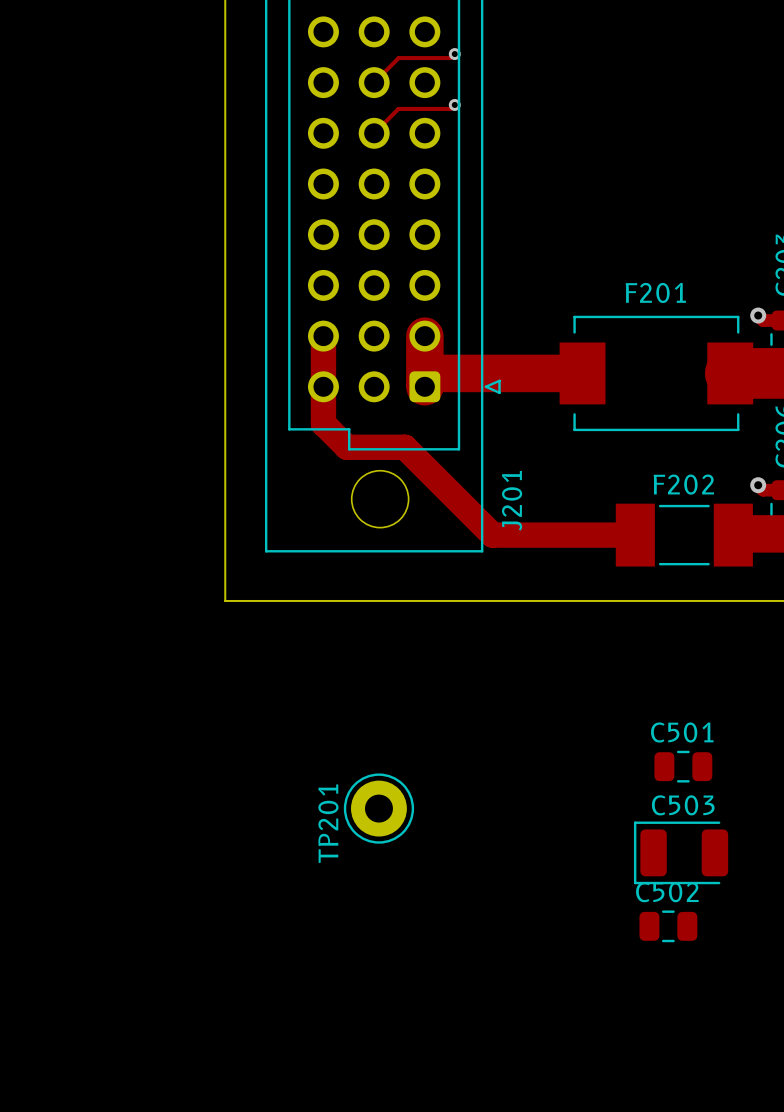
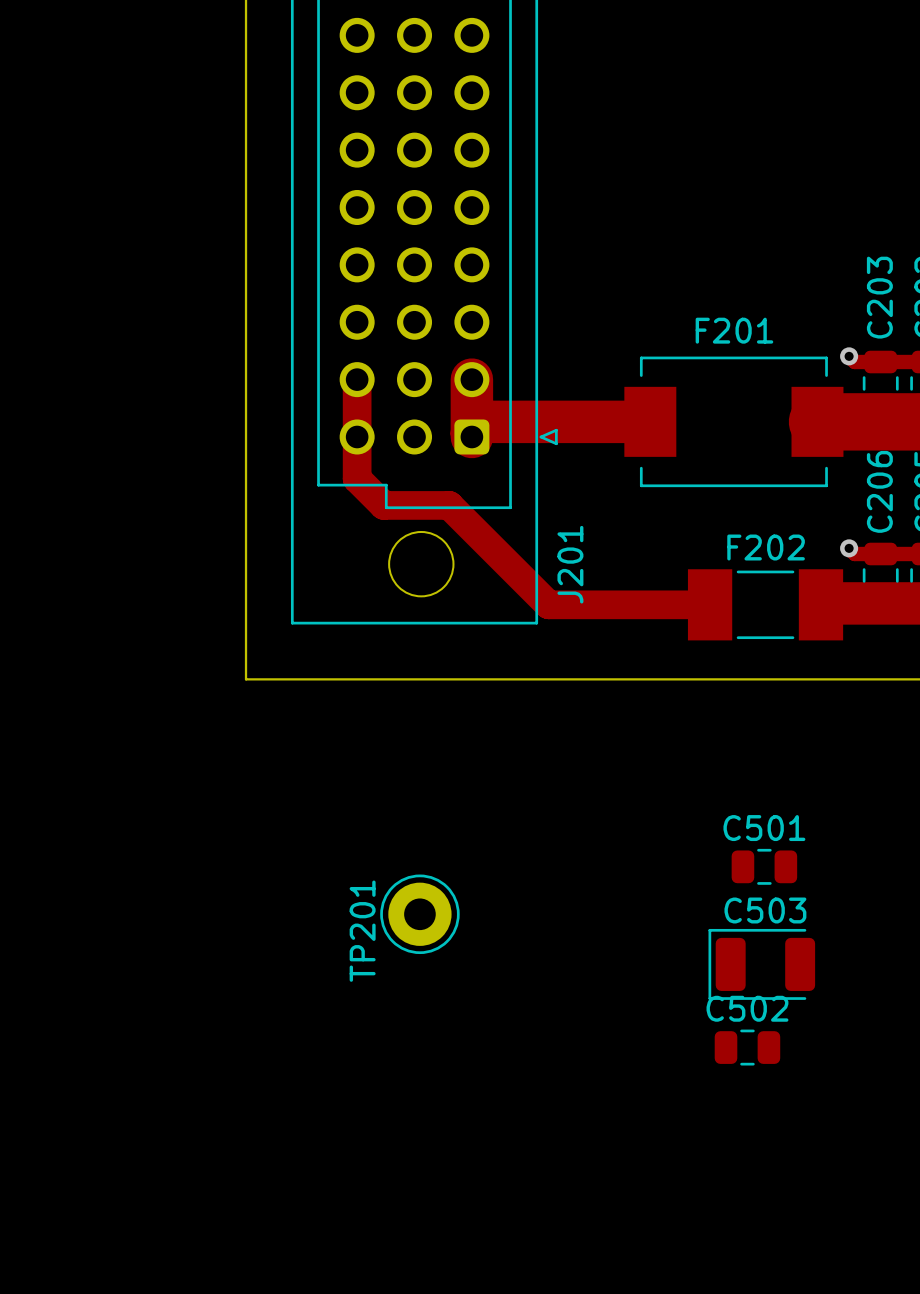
track: (454, 54) (450, 58) (398, 58) (374, 82) -> none
via: (454, 54) -> none
track: (454, 104) (450, 108) (398, 108) (374, 133) -> none
via: (454, 104) -> none

